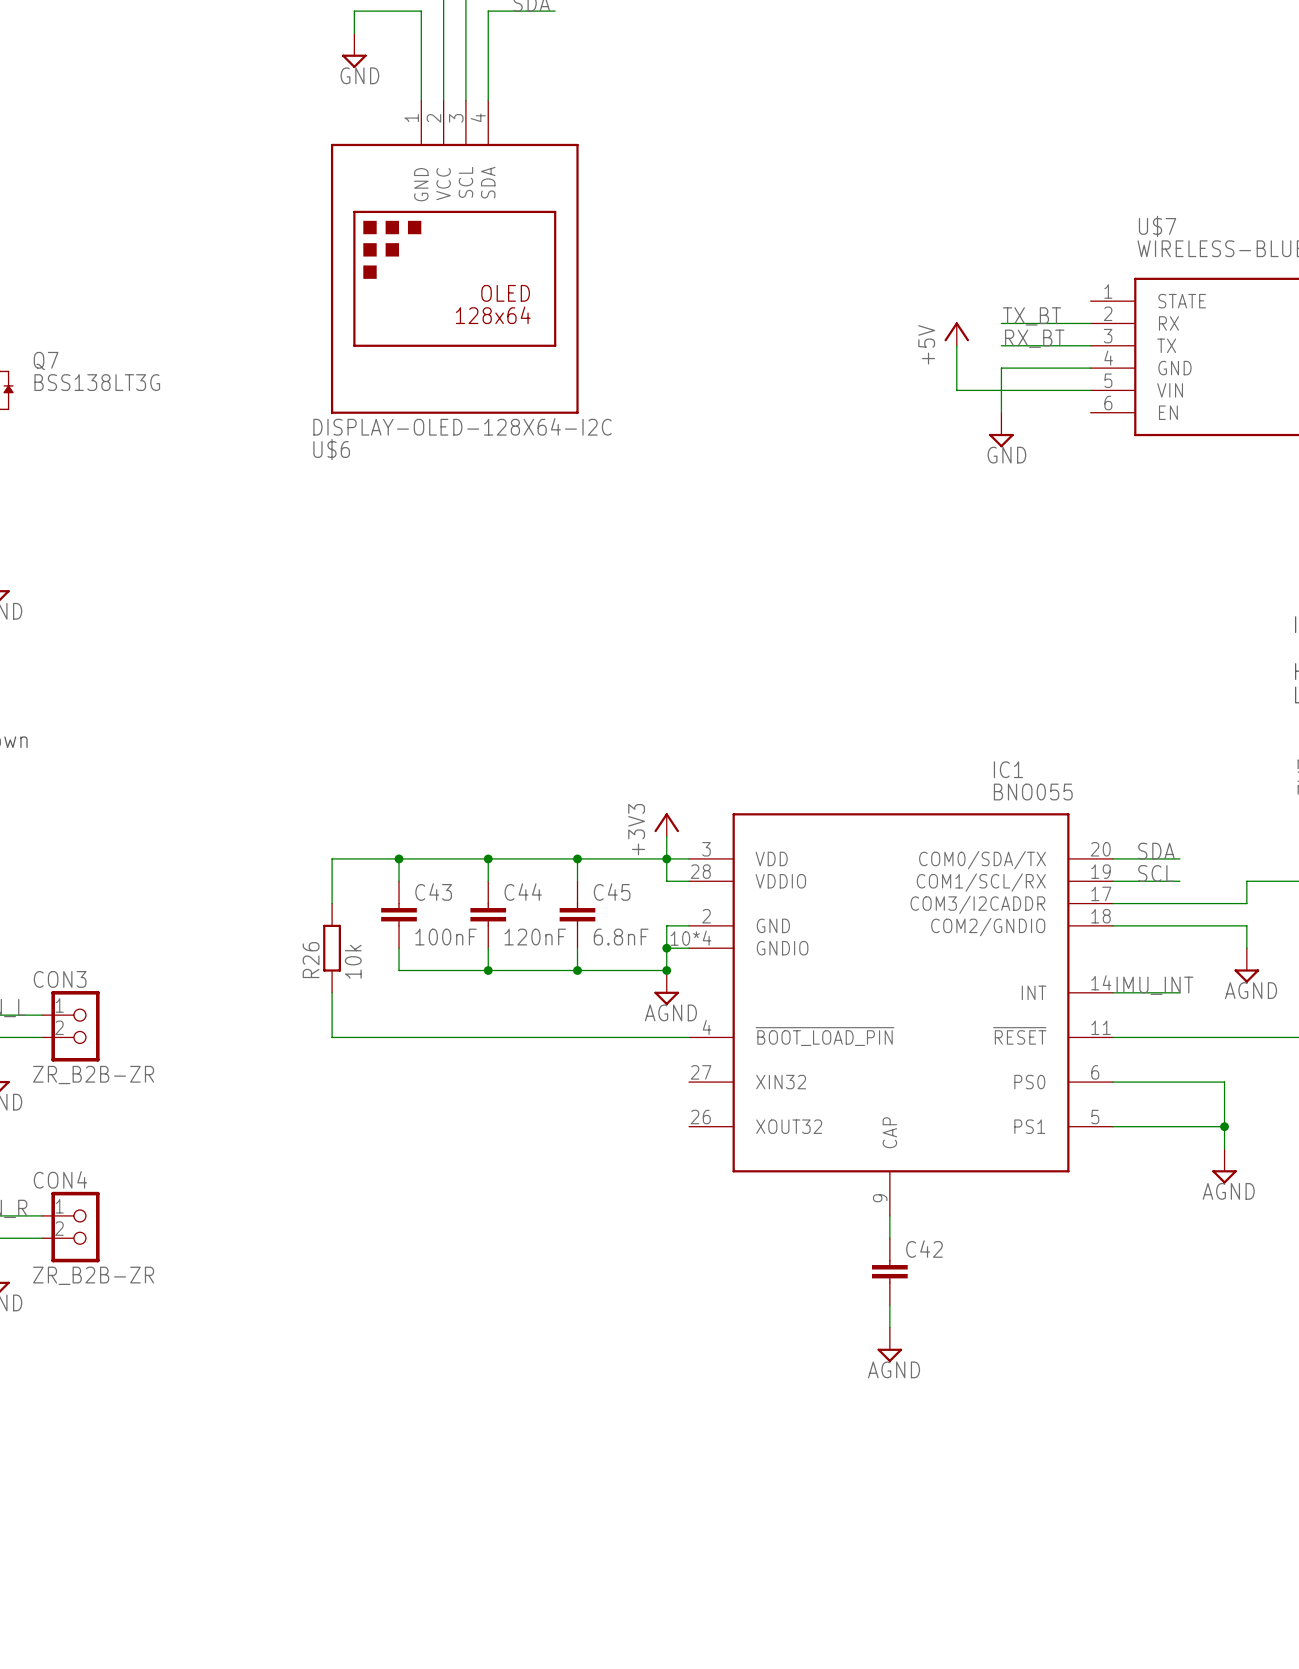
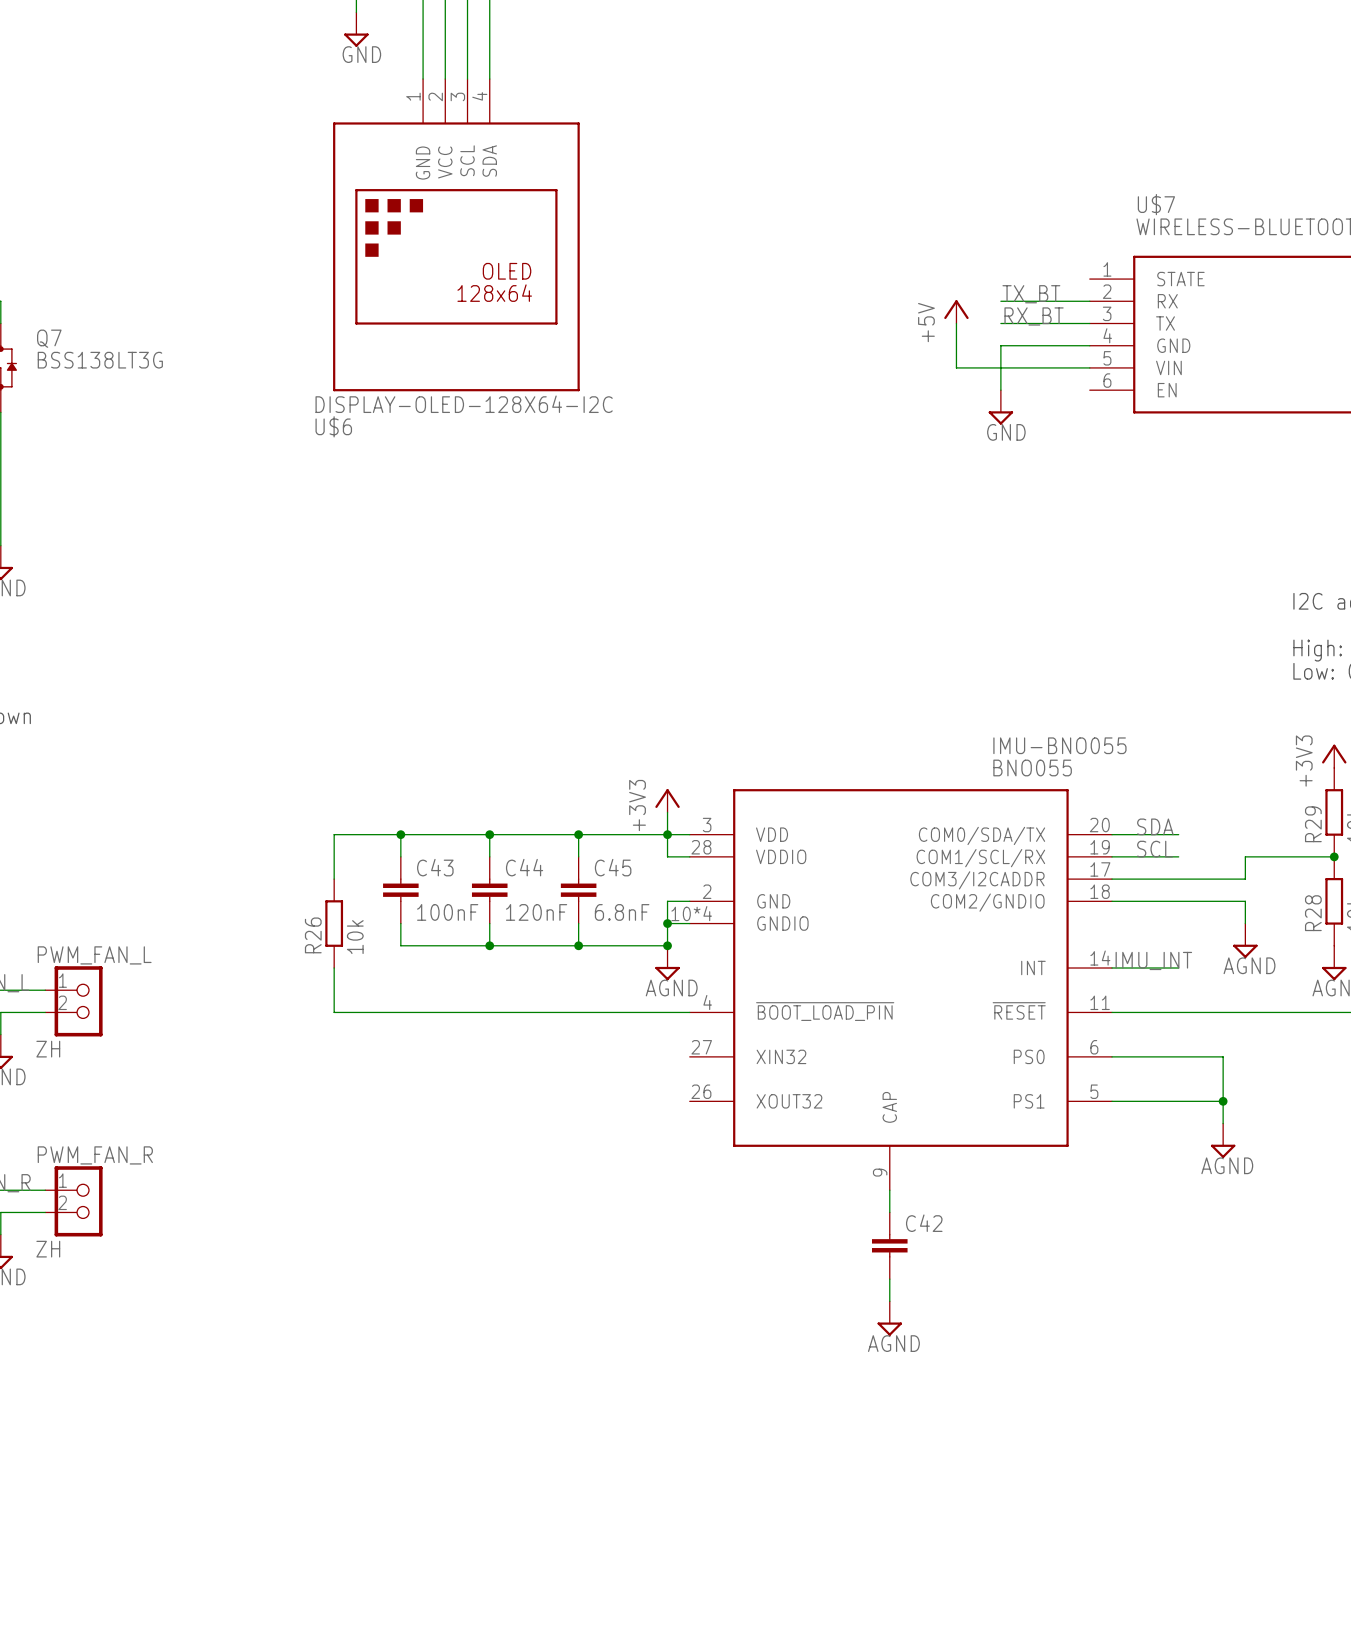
IC1 name: IC1 (1008, 769) -> IMU-BNO055 (1059, 745)
CON3 name: CON3 (60, 979) -> PWM_FAN_L (94, 955)
CON3 value: ZR_B2B-ZR (93, 1075) -> ZH (48, 1049)
CON4 name: CON4 (60, 1179) -> PWM_FAN_R (95, 1155)
CON4 value: ZR_B2B-ZR (93, 1275) -> ZH (48, 1249)

